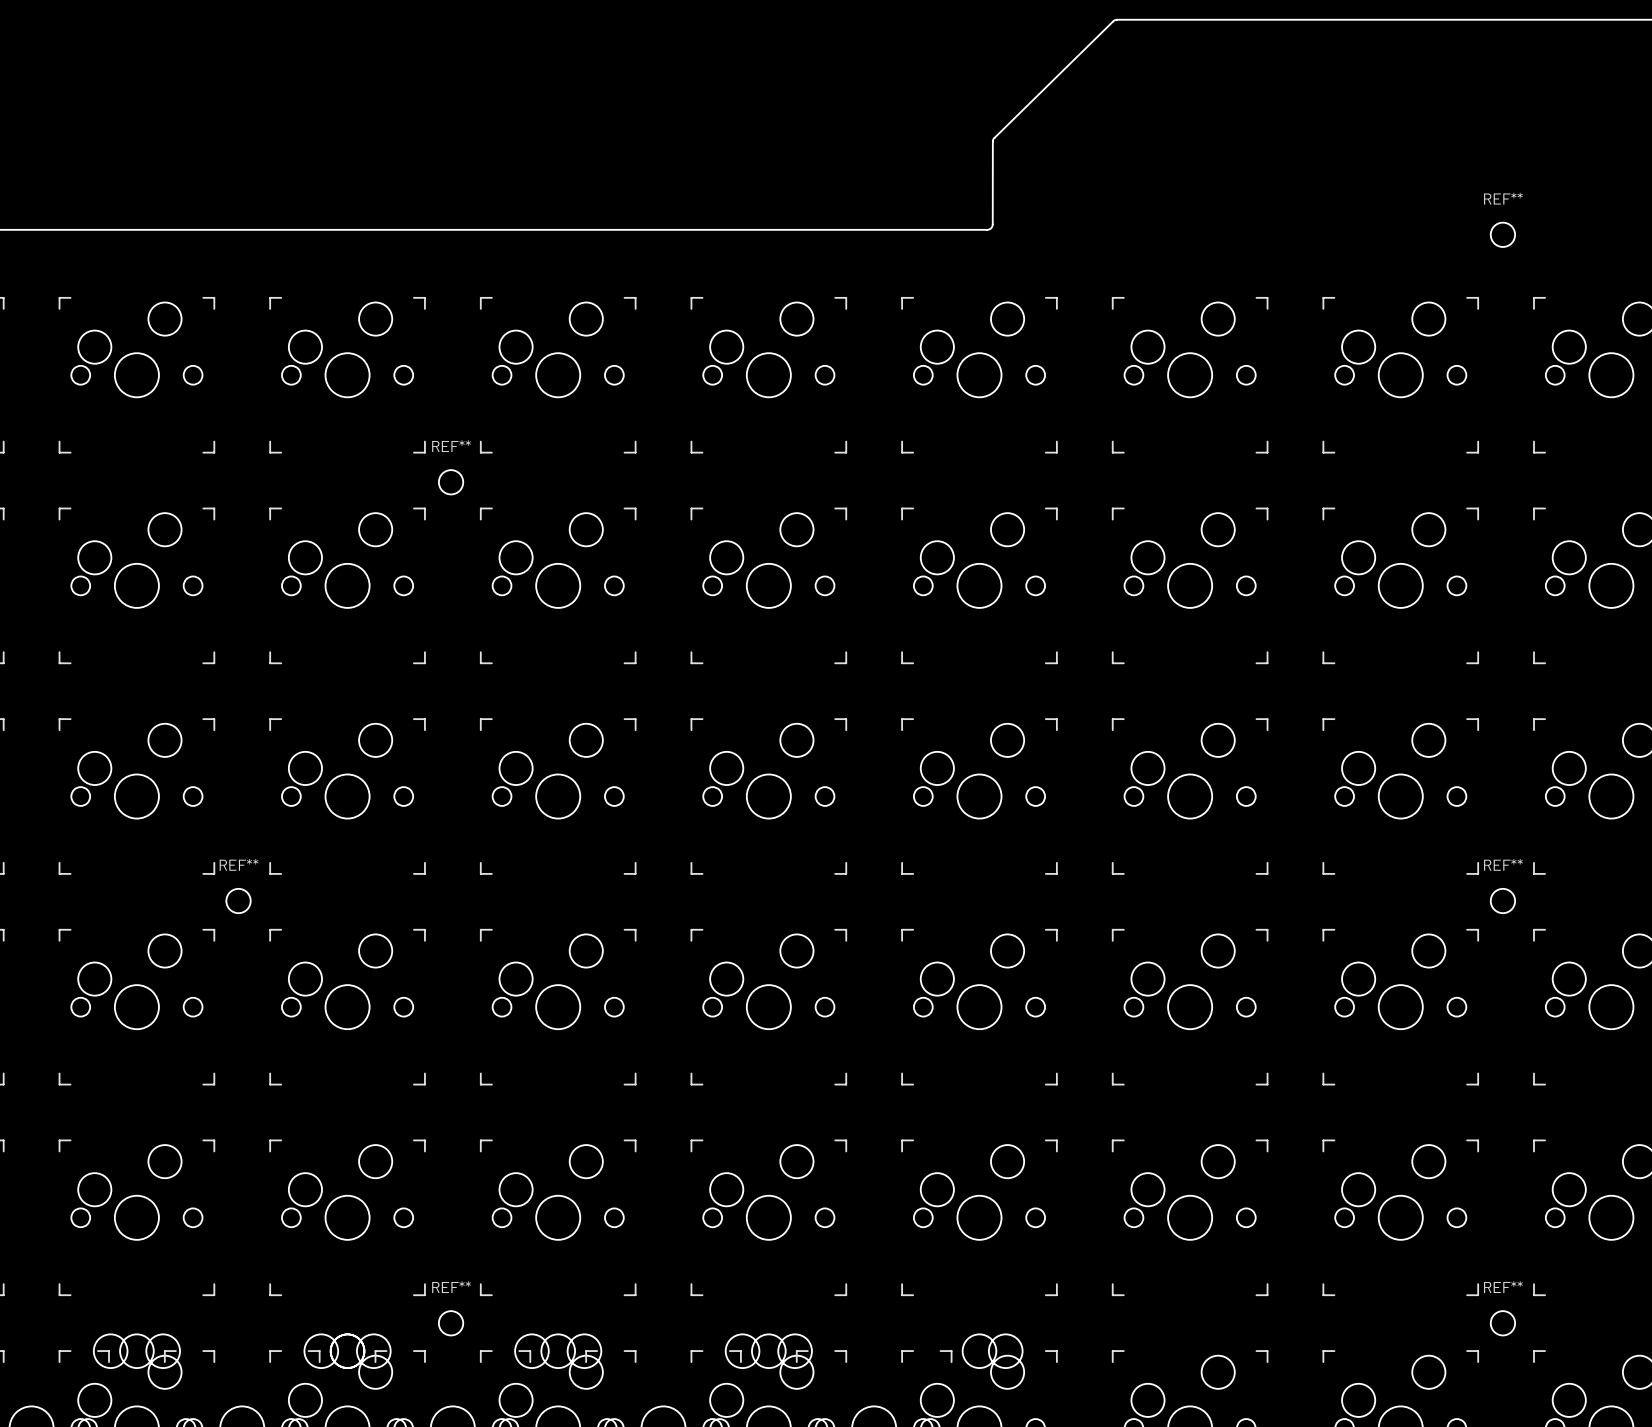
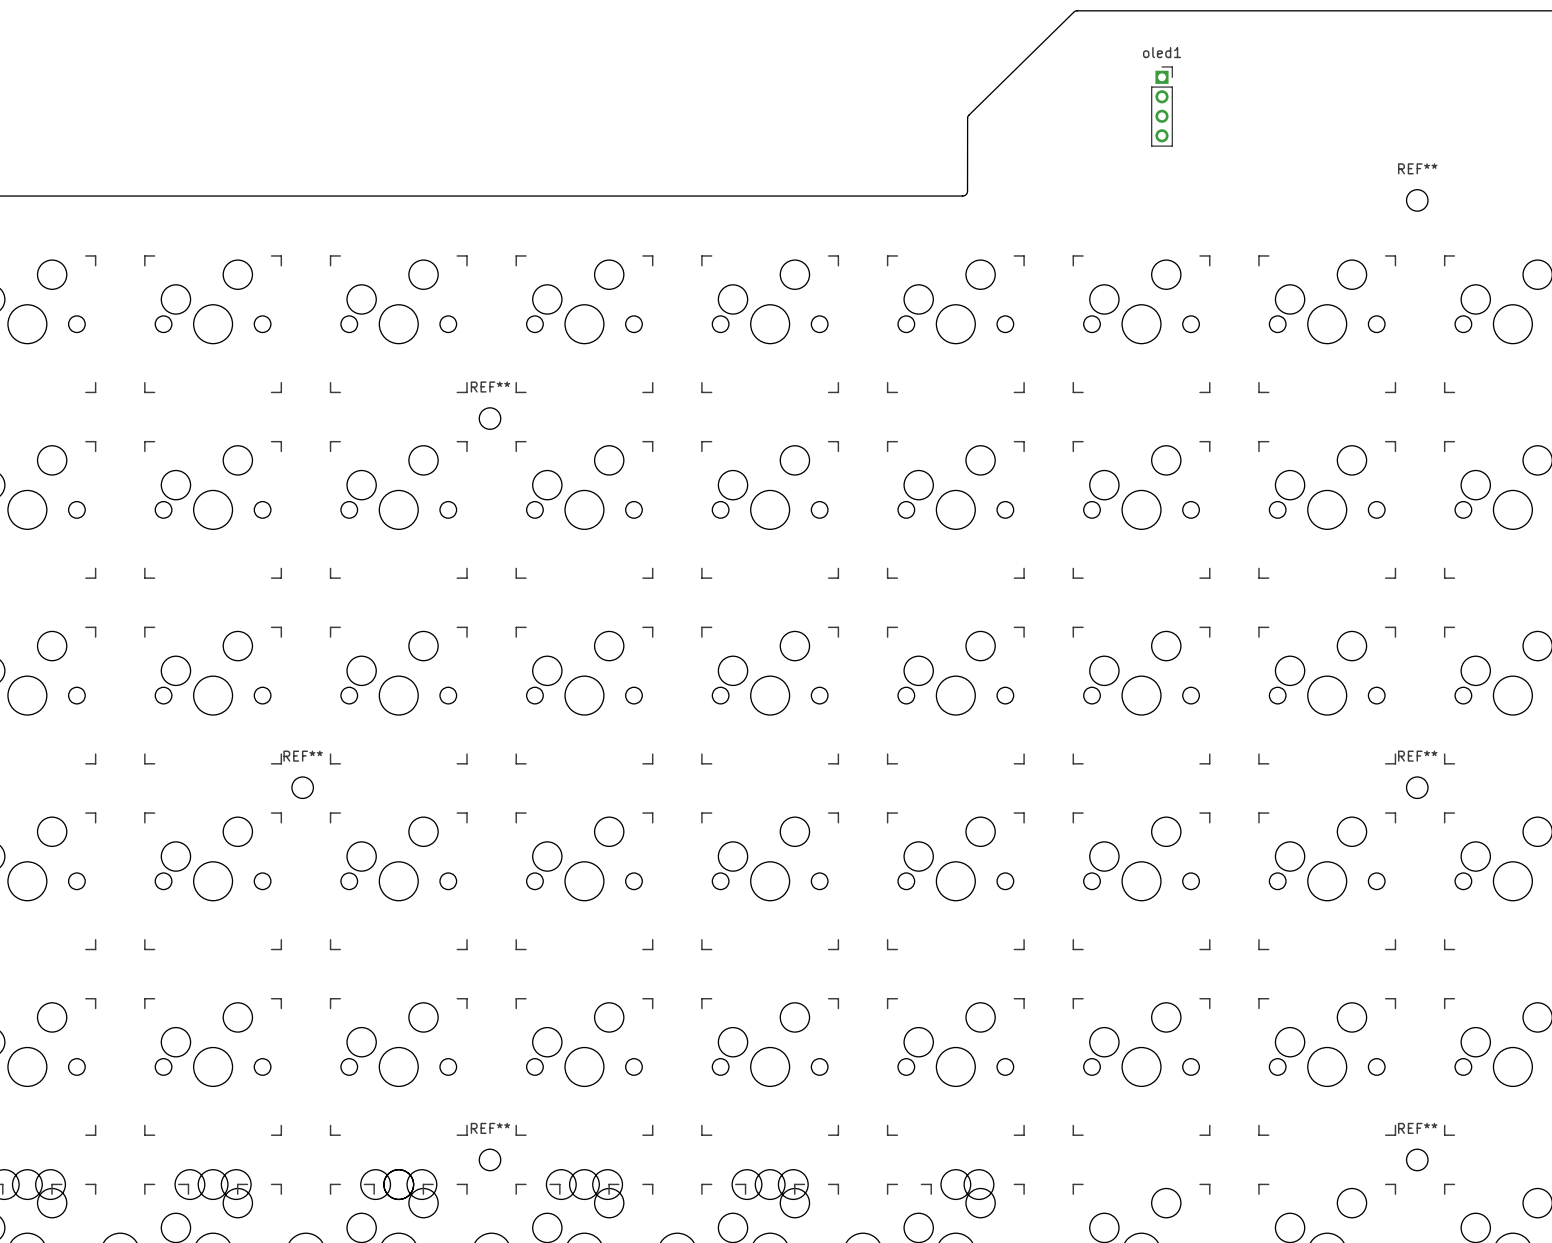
oled1: none -> (1161, 106)

